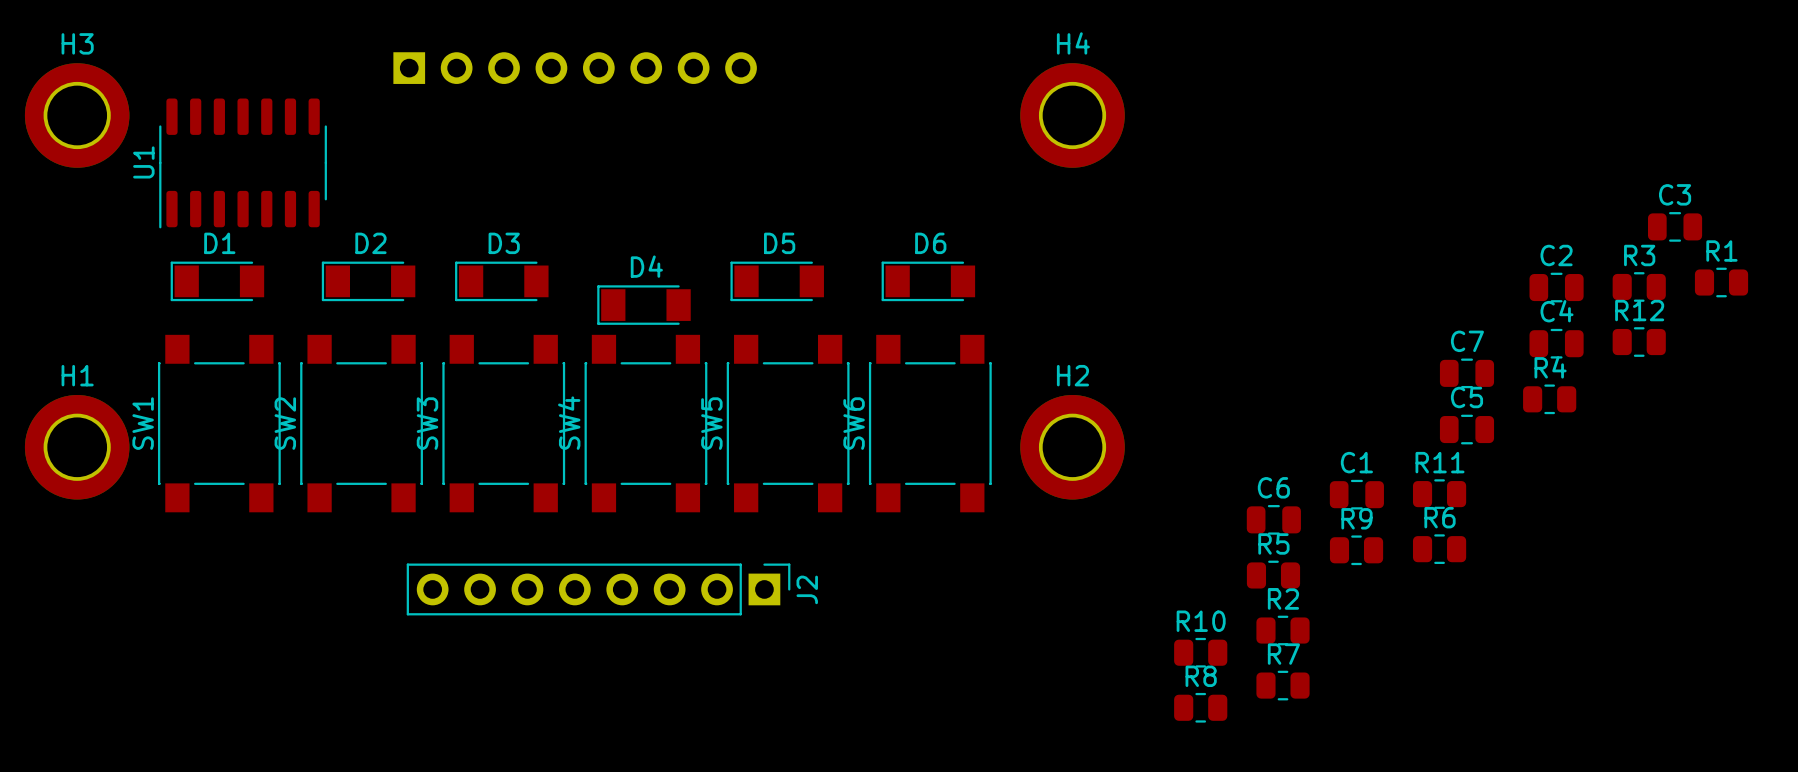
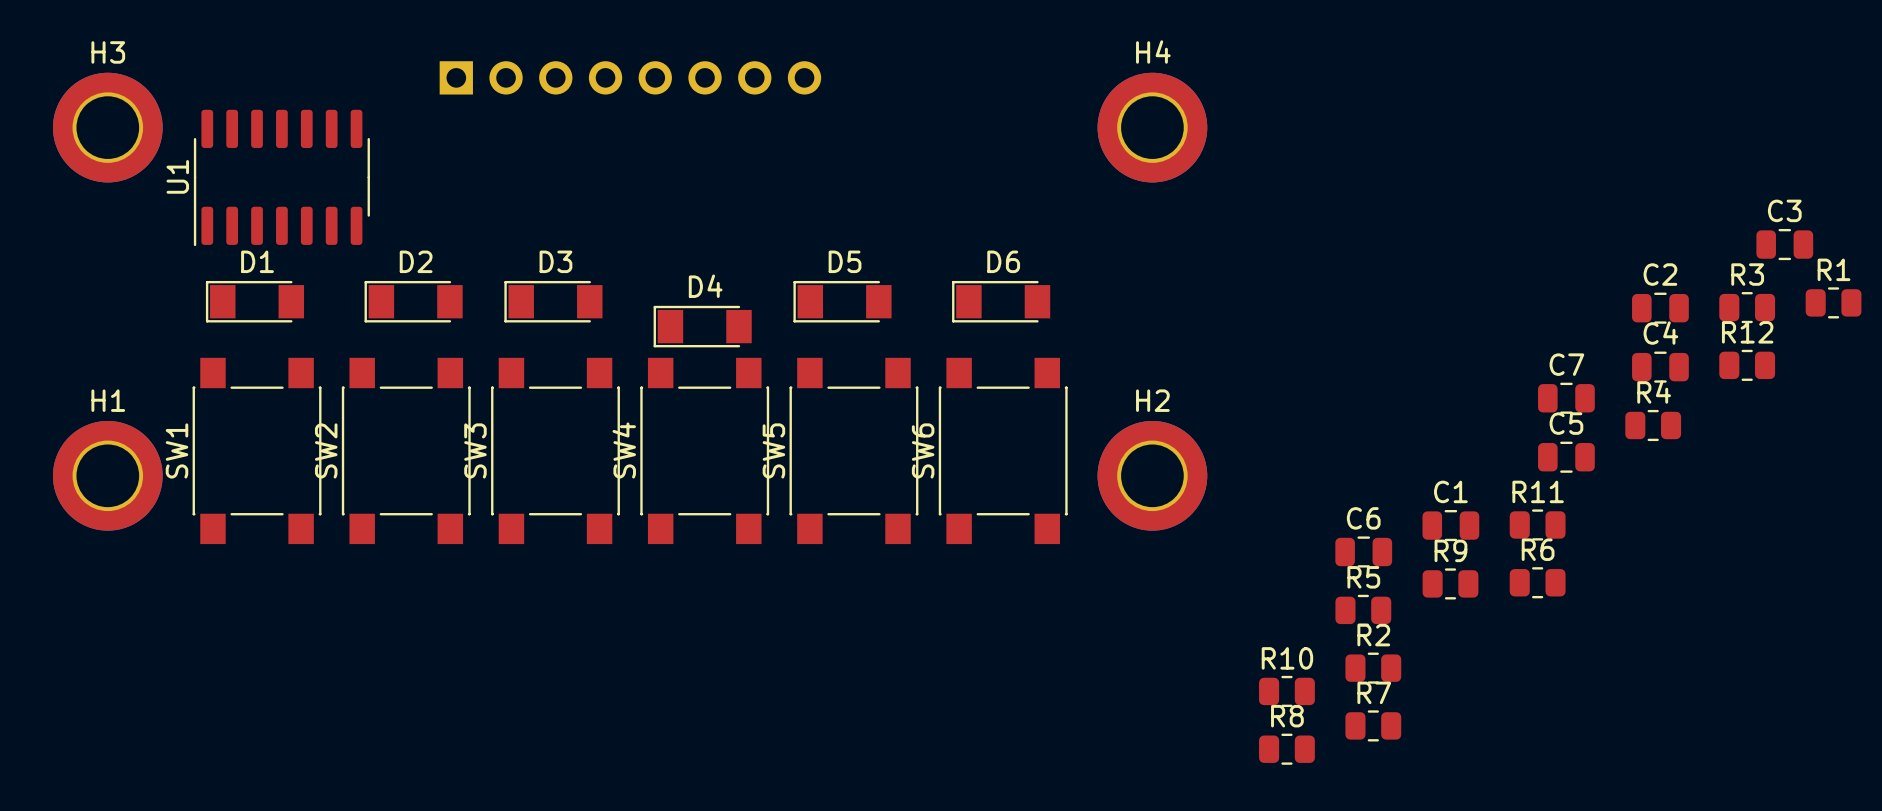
J2: (598, 589) -> none

